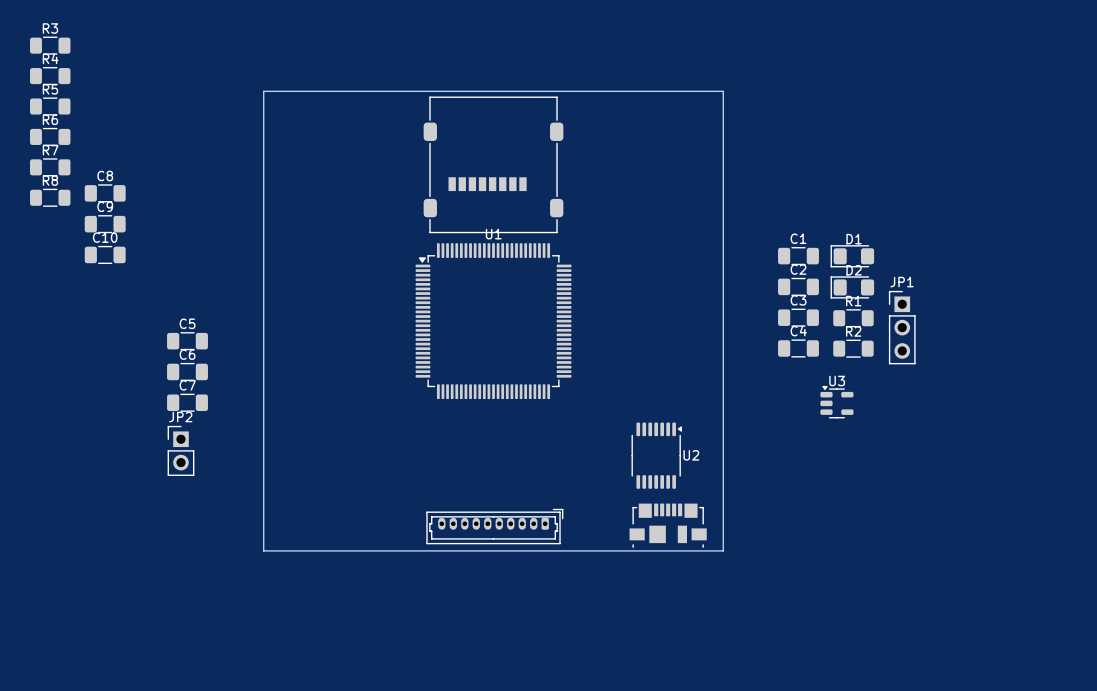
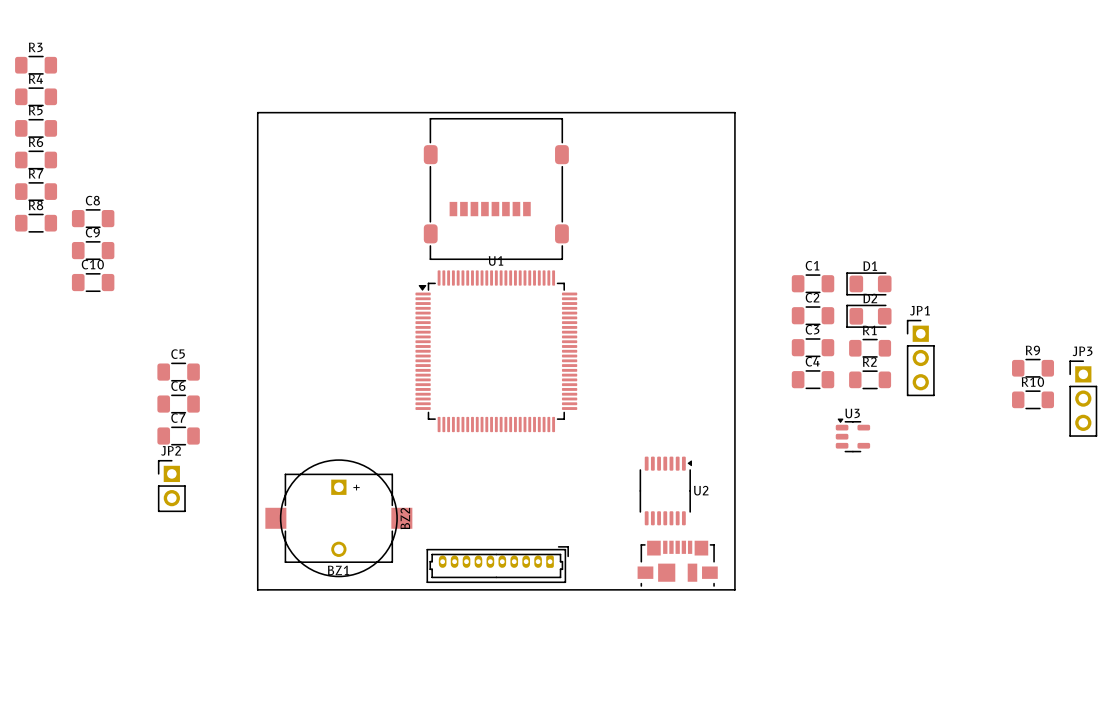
R9: none -> (1033, 368)
JP3: none -> (1083, 398)
R10: none -> (1033, 399)
BZ2: none -> (338, 518)
BZ1: none -> (338, 518)

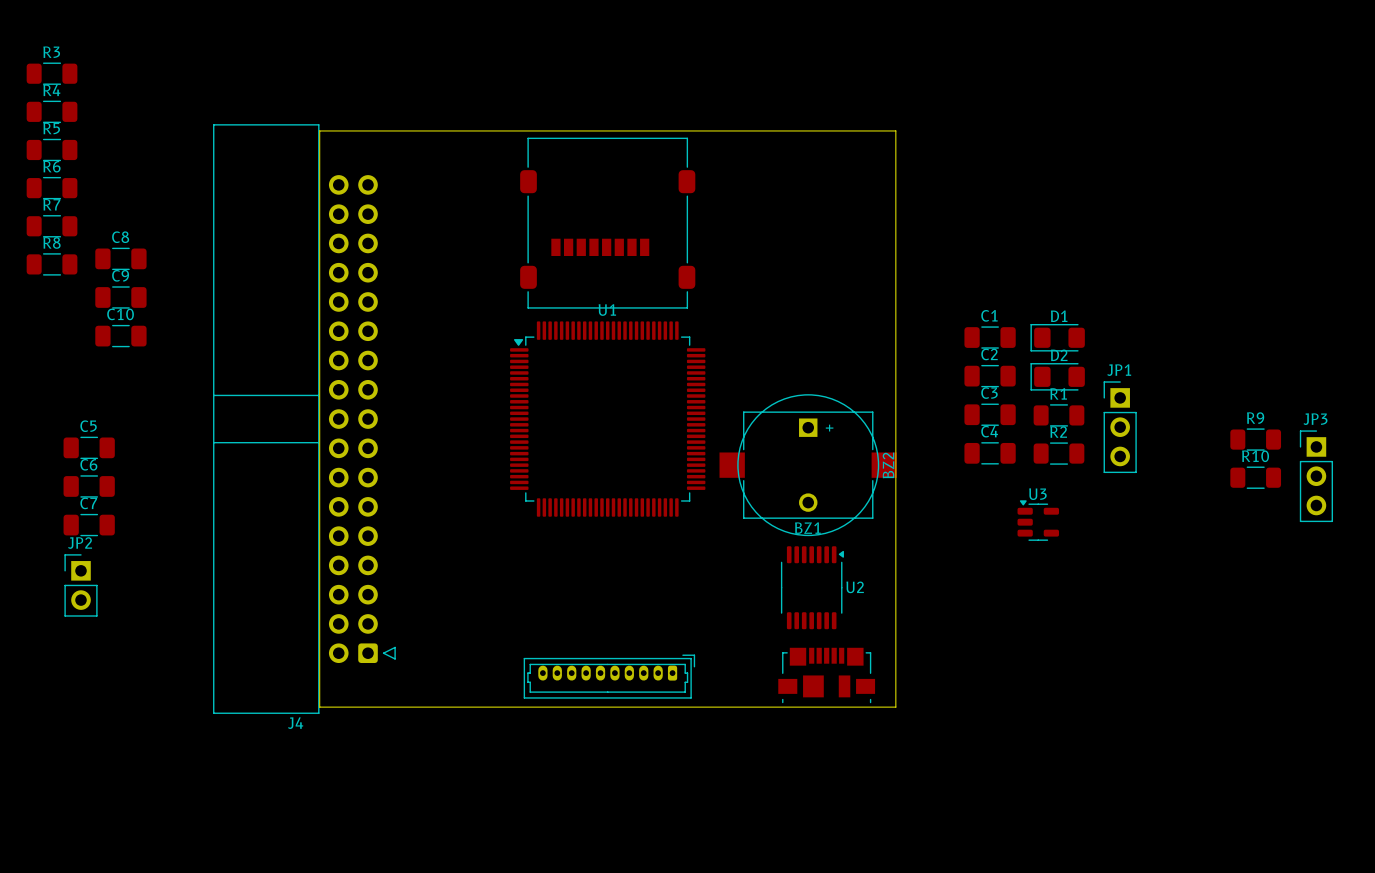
J4: none -> (304, 419)
C5 position: (178, 372) -> (89, 447)
C6 position: (178, 404) -> (89, 486)
C7 position: (178, 436) -> (89, 525)
JP2 position: (171, 486) -> (81, 585)
BZ2 position: (338, 518) -> (808, 465)
BZ1 position: (338, 518) -> (808, 465)

